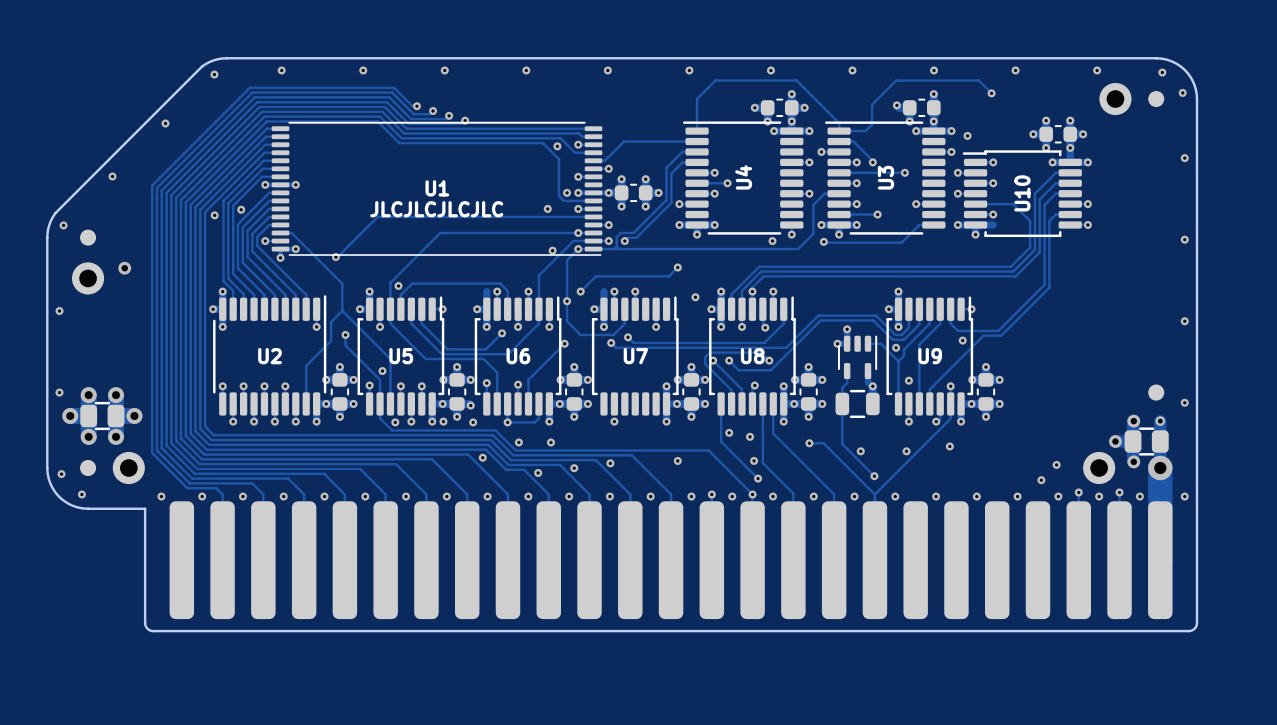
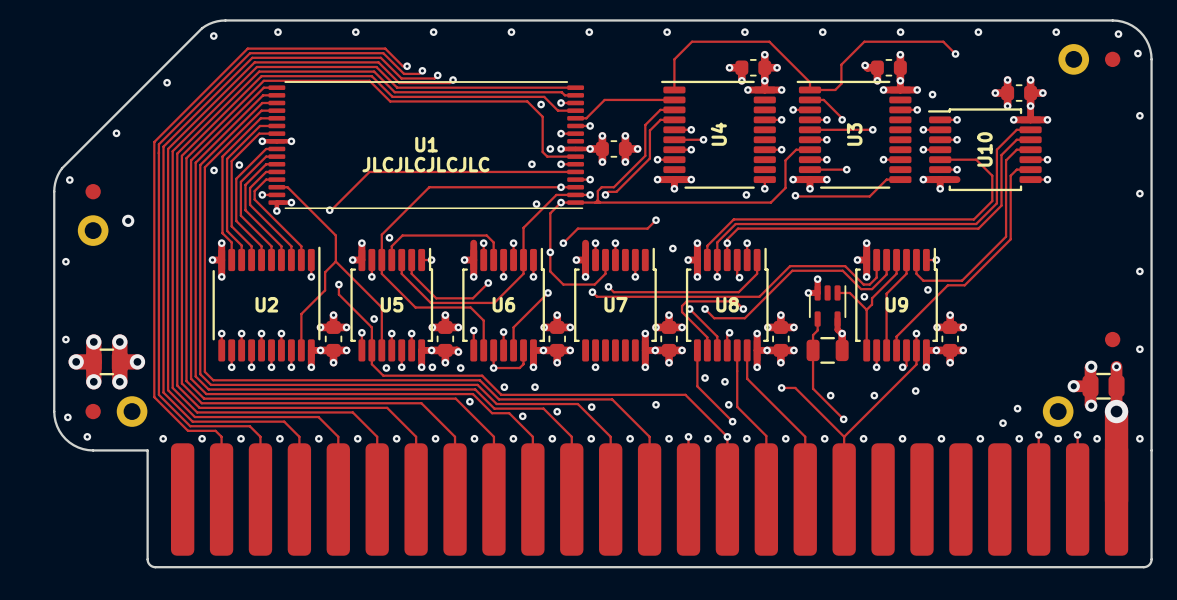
via: (908, 380) -> none

